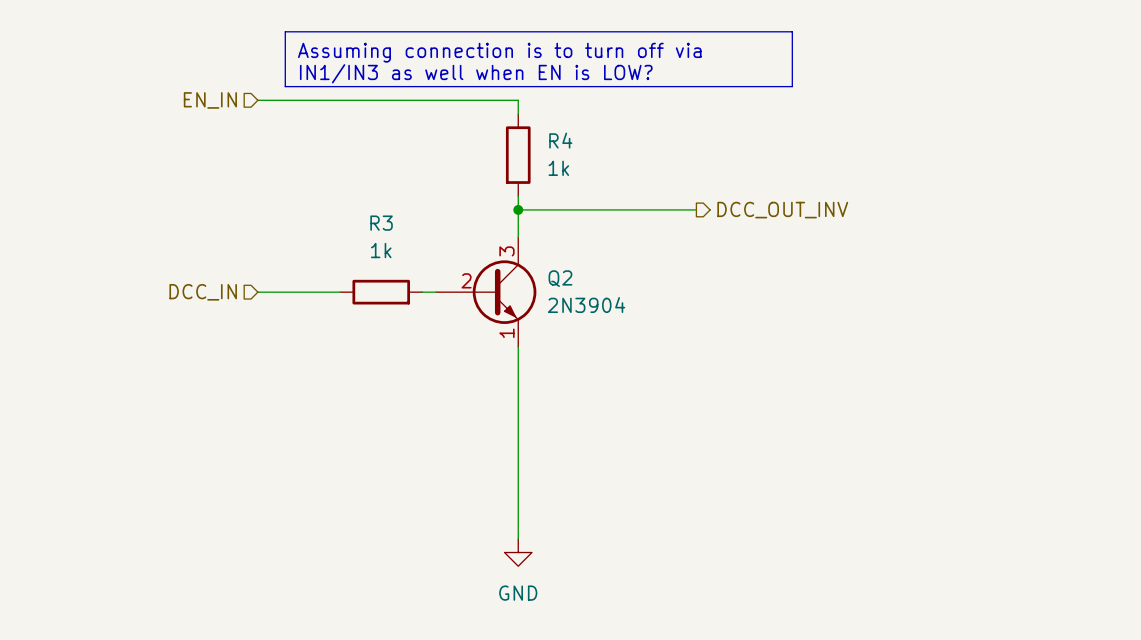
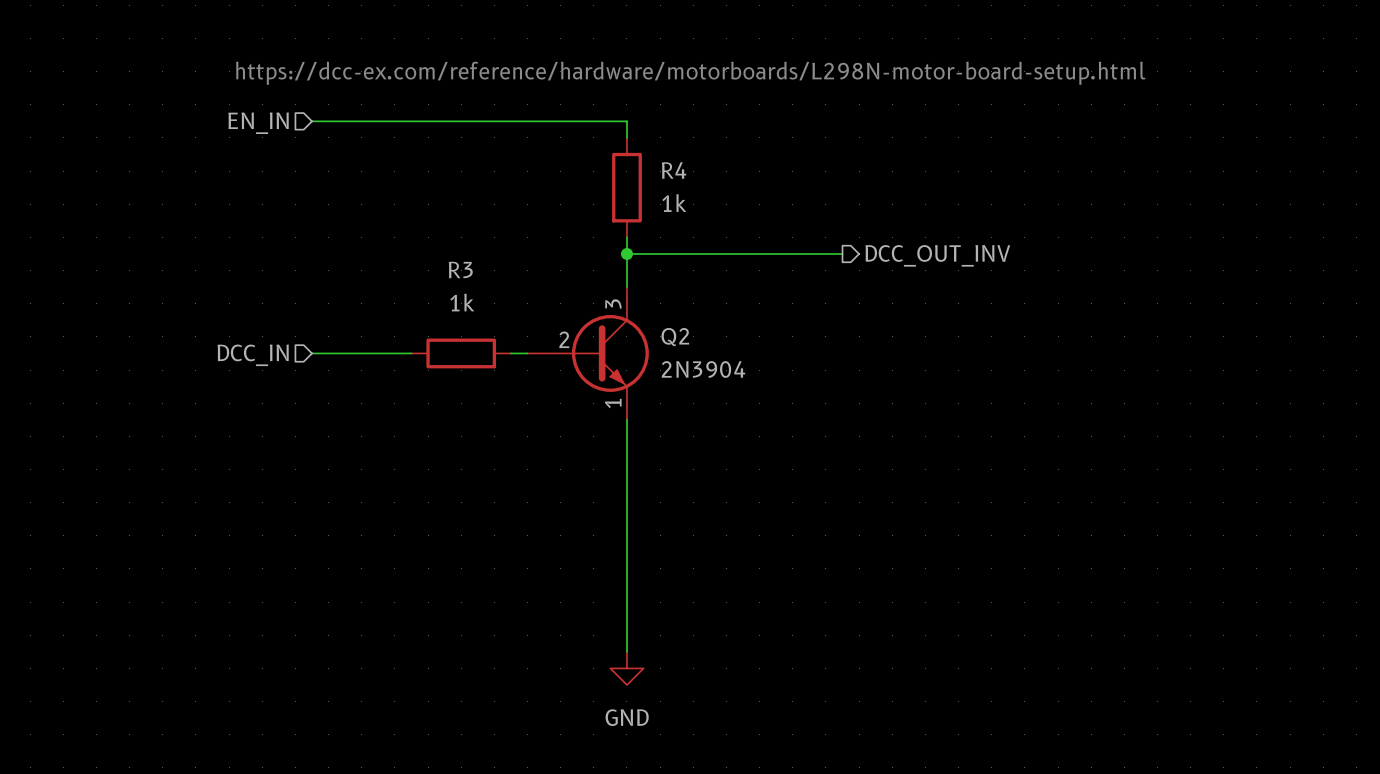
line: (285, 31) (792, 31) (792, 86) (285, 86) (285, 31) -> none
text: Assuming connection is to turn off via (499, 52) -> none
text: none -> https://dcc-ex.com/reference/hardware/motorboards/L298N-motor-board-setup.html (690, 73)
text: IN1/IN3 as well when EN is LOW? (476, 73) -> none

